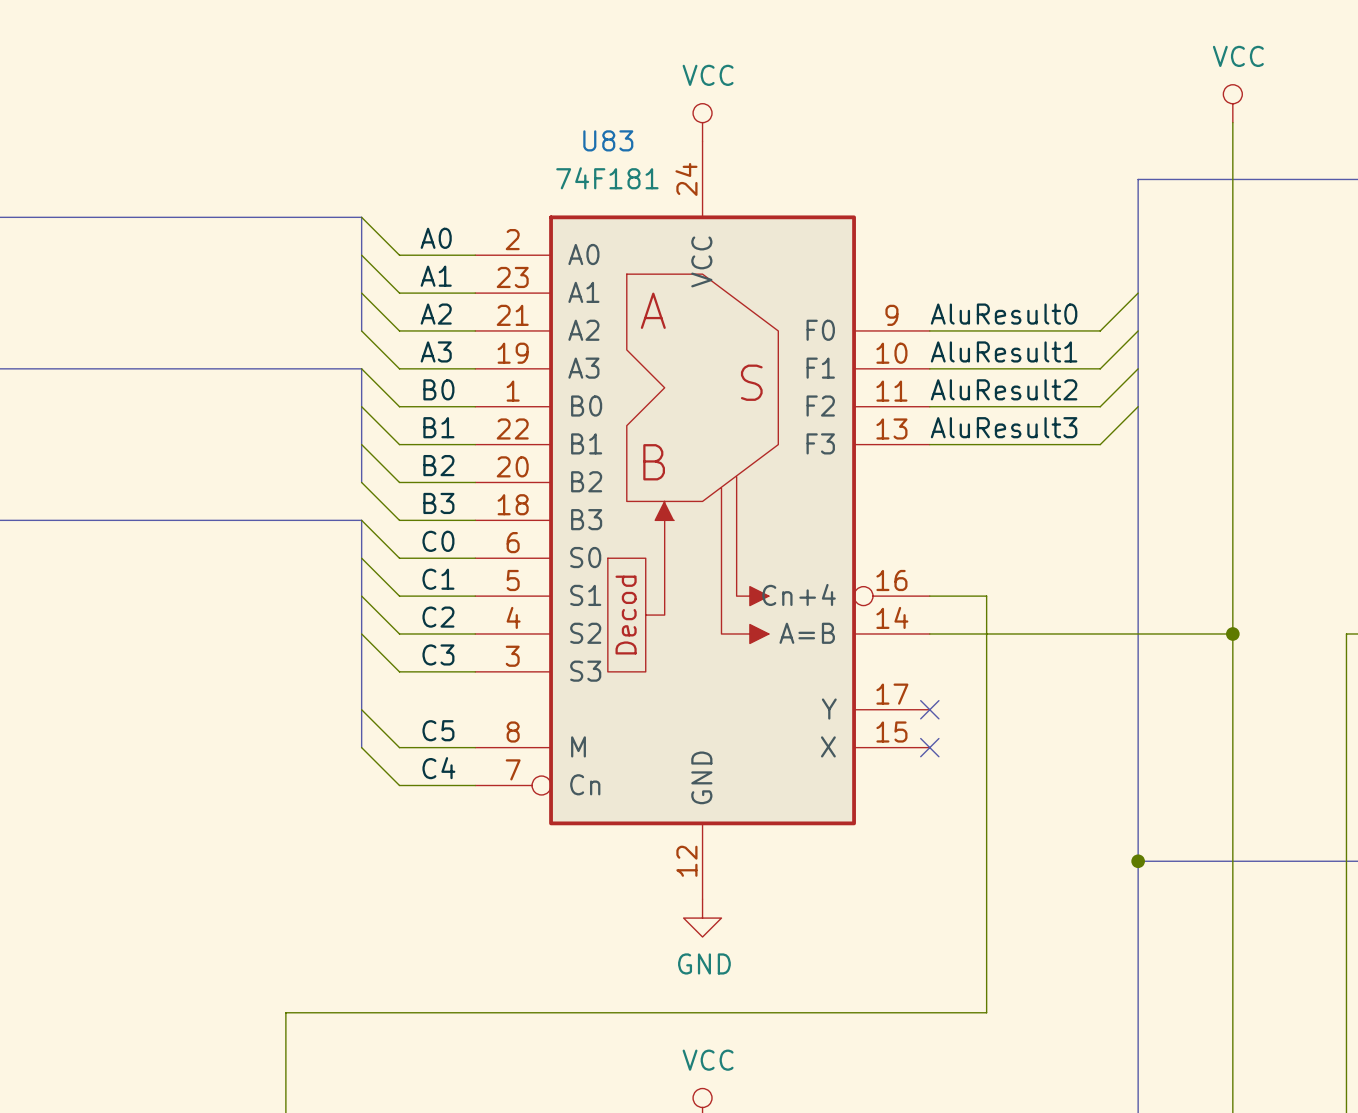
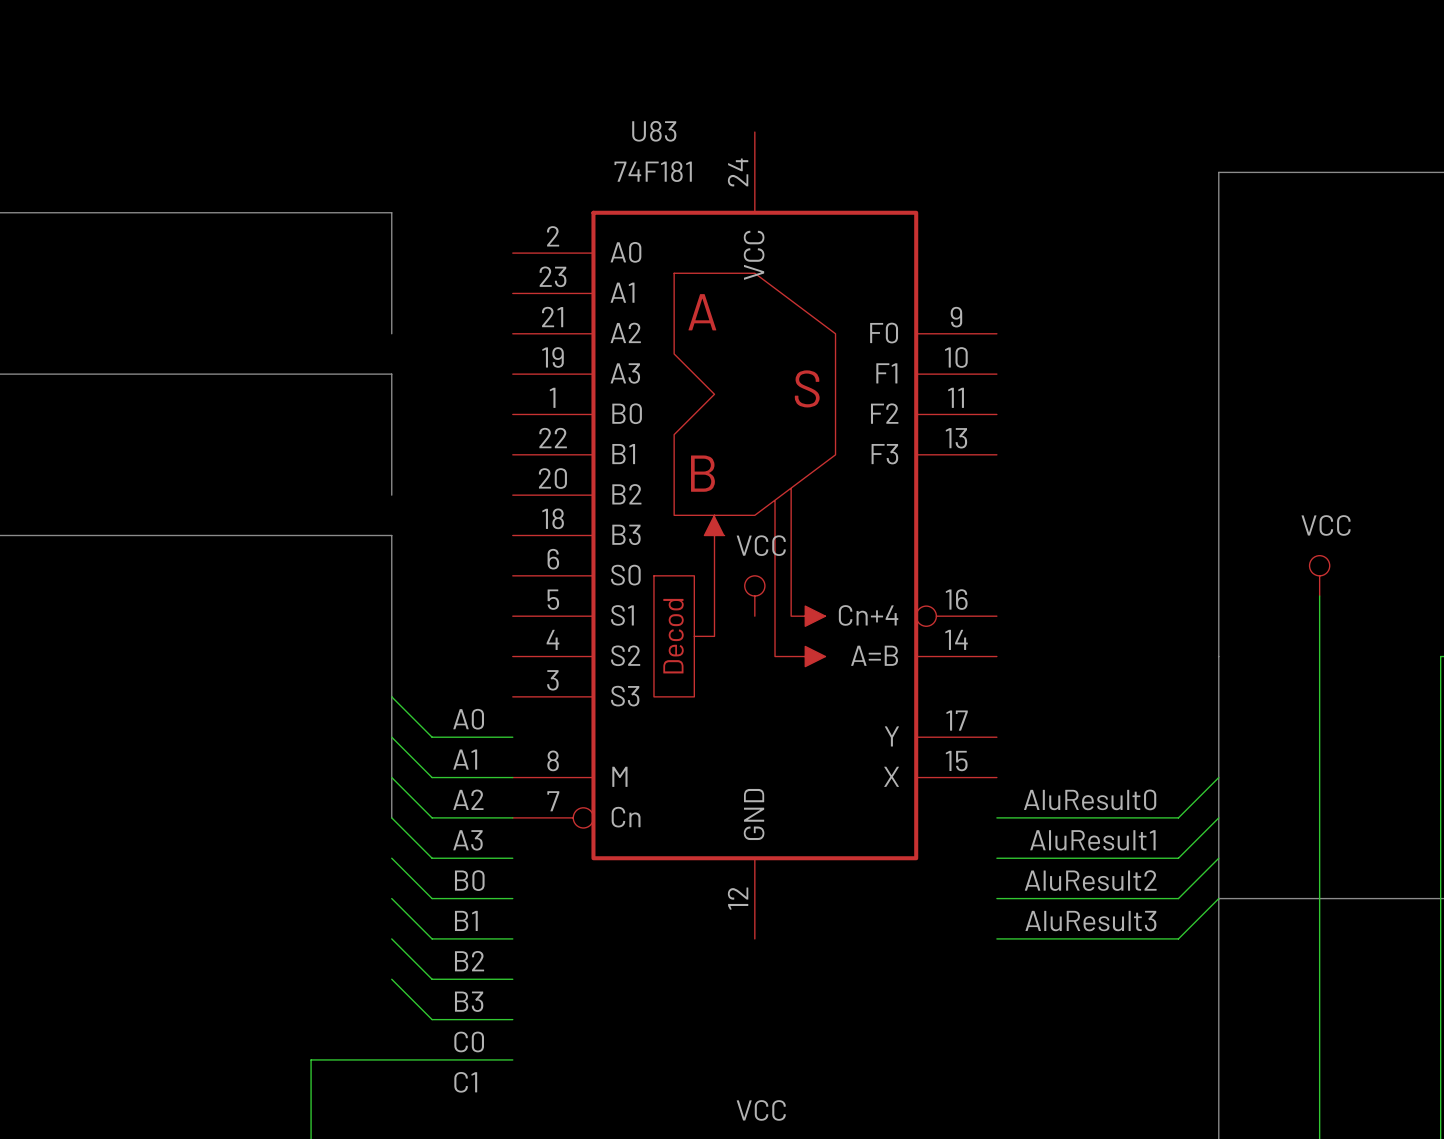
power symbol: VCC (1232, 103) -> none
power symbol: VCC (702, 122) -> none
wire: (1232, 122) (1232, 577) -> none
wire: (361, 217) (399, 255) (475, 255) -> none
label: A0 (436, 238) -> none
wire: (361, 255) (399, 293) (475, 293) -> none
label: A1 (436, 276) -> none
wire: (361, 293) (399, 330) (475, 330) -> none
wire: (1138, 293) (1100, 330) (929, 330) -> none
label: A2 (436, 314) -> none
label: AluResult0 (1004, 314) -> none
wire: (361, 330) (399, 368) (475, 368) -> (391, 696) (432, 737) (512, 737)
wire: (1138, 330) (1100, 368) (929, 368) -> none
label: A3 (436, 351) -> none
label: AluResult1 (1004, 351) -> none
wire: (361, 368) (399, 406) (475, 406) -> none
wire: (1138, 368) (1100, 406) (929, 406) -> none
label: B0 (438, 389) -> none
label: AluResult2 (1004, 389) -> none
wire: (361, 406) (399, 444) (475, 444) -> none
wire: (1138, 406) (1100, 444) (929, 444) -> (1218, 777) (1178, 817) (996, 817)
label: B1 (438, 427) -> none
label: AluResult3 (1004, 427) -> none
wire: (361, 444) (399, 482) (475, 482) -> (391, 817) (432, 858) (512, 858)
label: B2 (438, 465) -> none
wire: (361, 482) (399, 520) (475, 520) -> (391, 858) (432, 898) (512, 898)
label: B3 (438, 503) -> none
wire: (361, 520) (399, 558) (475, 558) -> (391, 898) (432, 938) (512, 938)
label: C0 (438, 541) -> none
wire: (361, 558) (399, 596) (475, 596) -> (391, 938) (432, 979) (512, 979)
power symbol: none -> VCC (1319, 575)
power symbol: none -> VCC (754, 596)
label: C1 (438, 579) -> none
wire: (361, 596) (399, 633) (475, 633) -> (391, 979) (432, 1019) (512, 1019)
wire: (929, 596) (986, 596) (986, 1012) (475, 1012) -> none
label: C2 (438, 617) -> none
wire: (361, 633) (399, 671) (475, 671) -> none
wire: (929, 633) (1232, 633) -> none
junction: (1232, 633) -> none
label: C3 (438, 654) -> none
label: none -> A0 (468, 719)
no-connect mark: (929, 709) -> none
label: C5 (438, 730) -> A1 (465, 759)
bus: none -> (391, 777) (391, 817)
no-connect mark: (929, 747) -> none
label: C4 (438, 768) -> A2 (468, 799)
label: none -> AluResult0 (1090, 799)
wire: none -> (1218, 817) (1178, 858) (996, 858)
label: none -> A3 (467, 840)
label: none -> AluResult1 (1092, 840)
wire: none -> (1218, 858) (1178, 898) (996, 898)
label: none -> B0 (469, 880)
label: none -> AluResult2 (1090, 880)
wire: none -> (1218, 898) (1178, 938) (996, 938)
junction: (1138, 861) -> none
label: none -> B1 (466, 920)
label: none -> AluResult3 (1090, 921)
power symbol: GND (702, 918) -> none
label: none -> B2 (469, 961)
label: none -> B3 (469, 1001)
label: none -> C0 (469, 1041)
label: none -> C1 (465, 1082)

